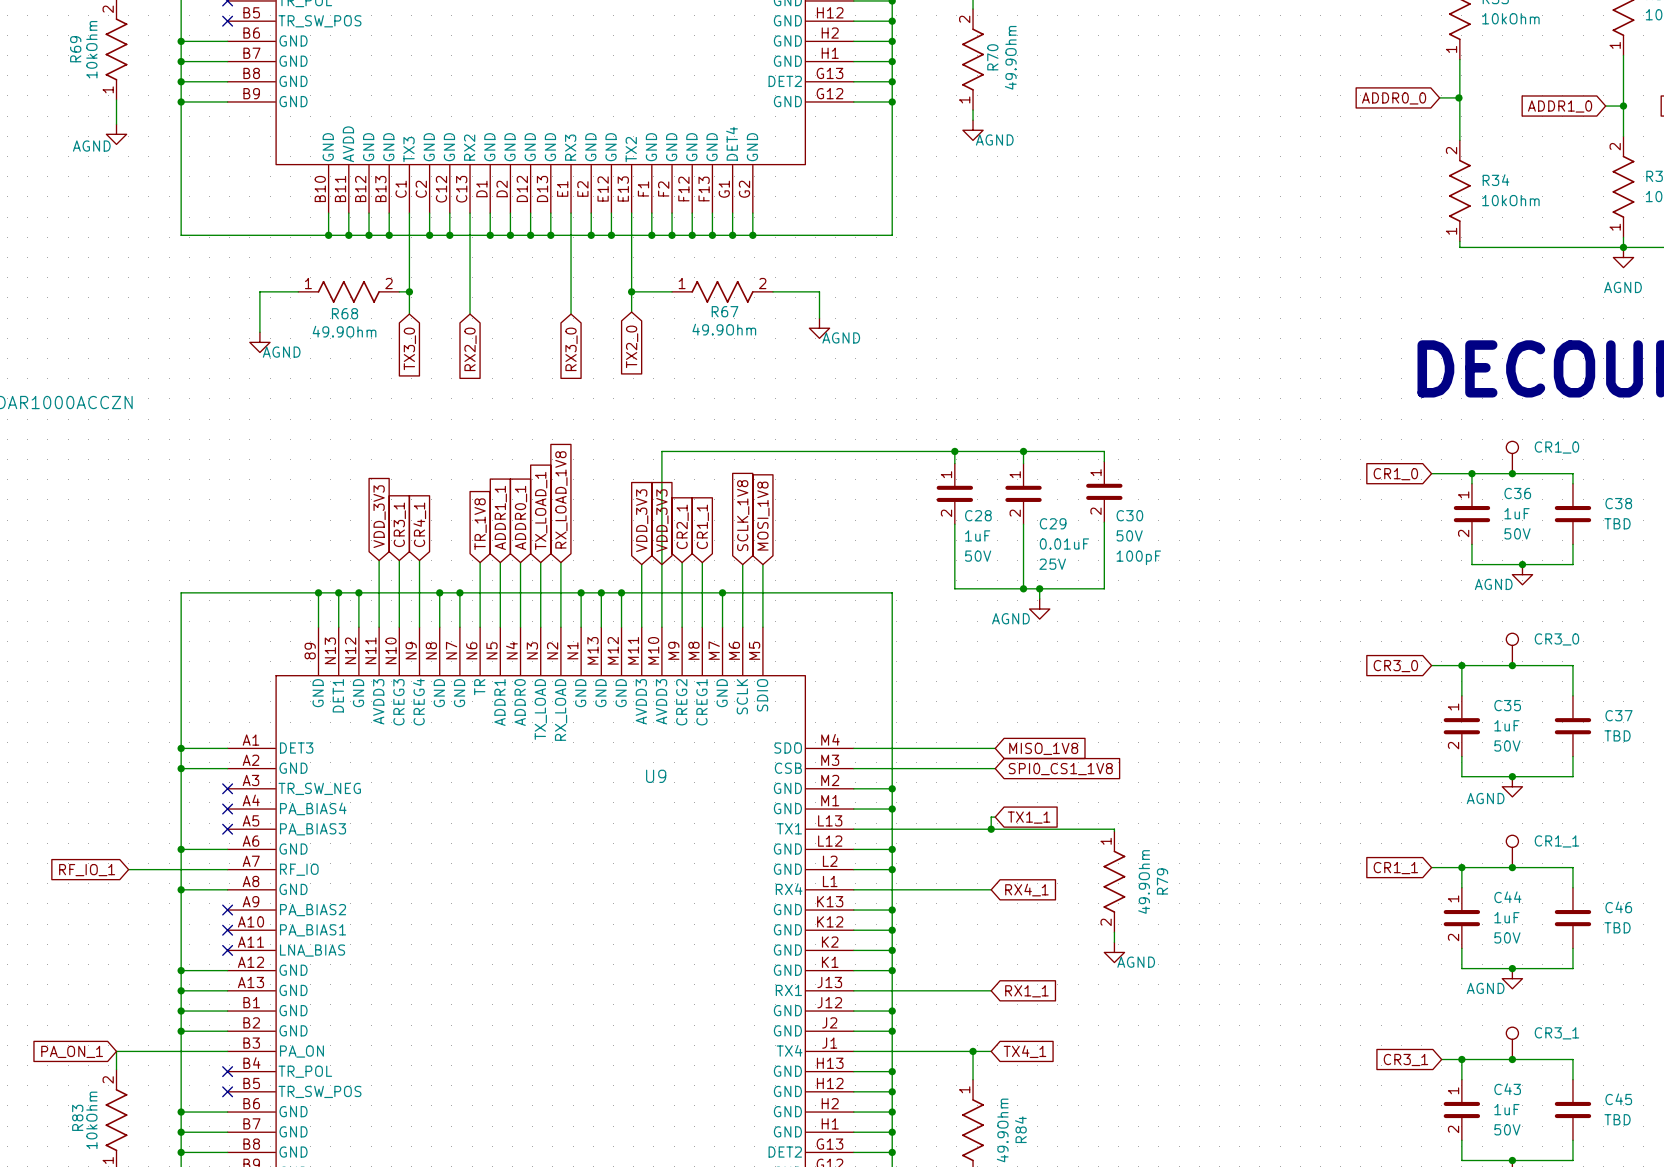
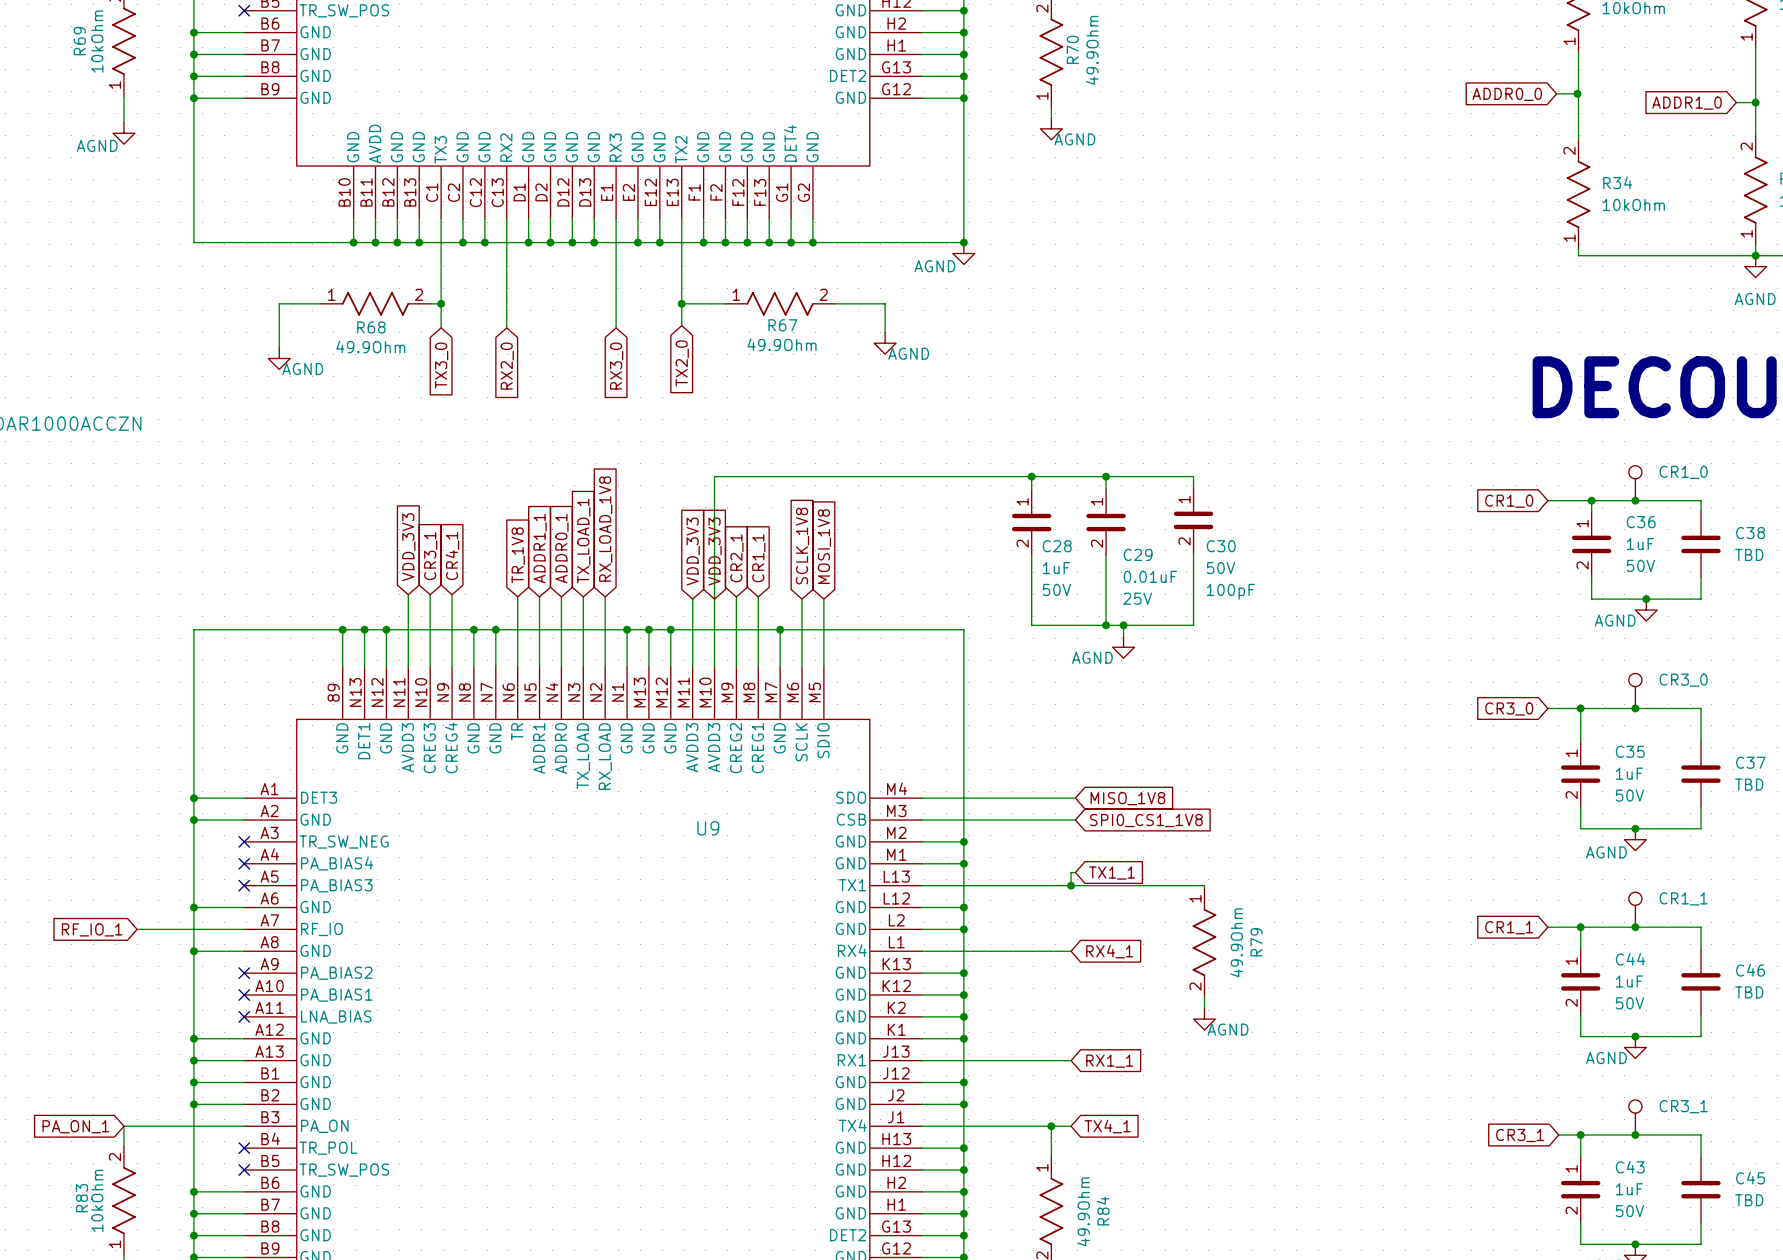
junction: none -> (963, 242)
power symbol: none -> AGND (963, 253)

